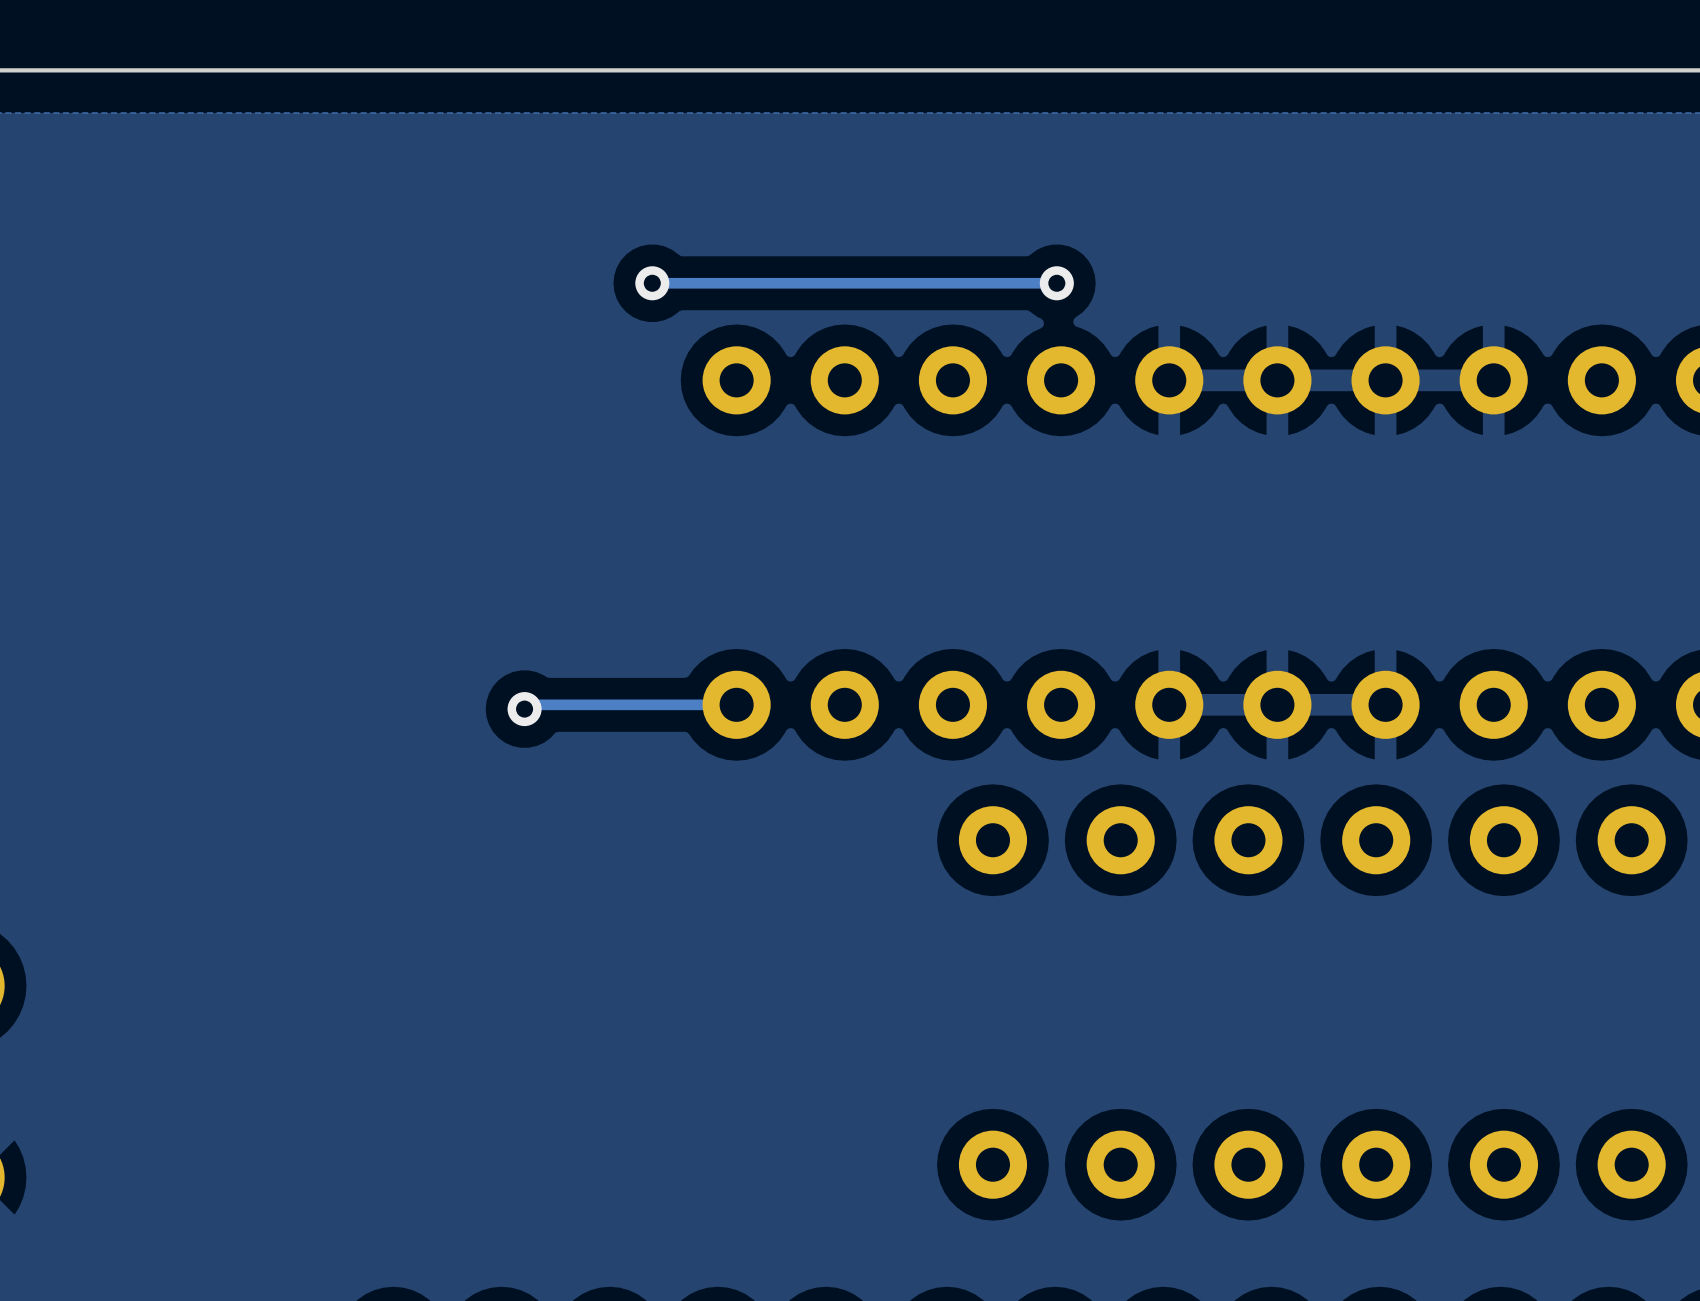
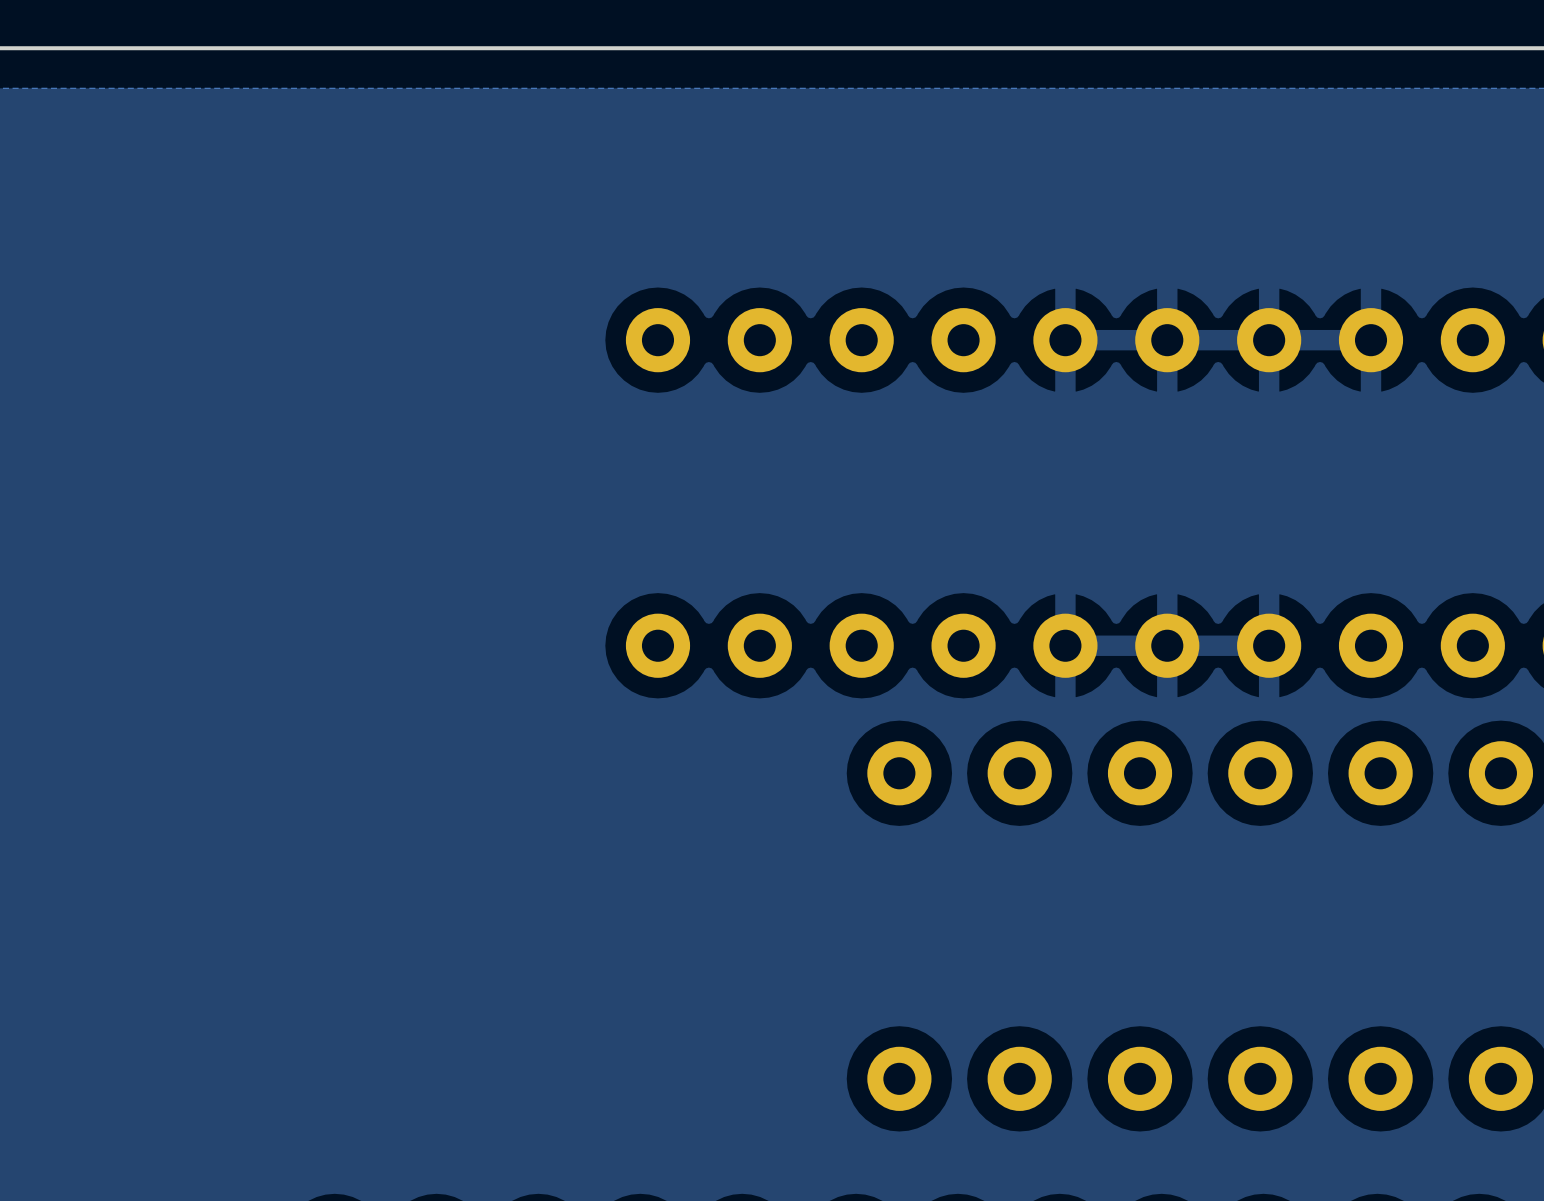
via: (652, 283) -> none
track: (1056, 283) (652, 283) -> none
via: (1056, 283) -> none
track: (736, 704) (528, 704) (524, 709) -> none
via: (524, 709) -> none

